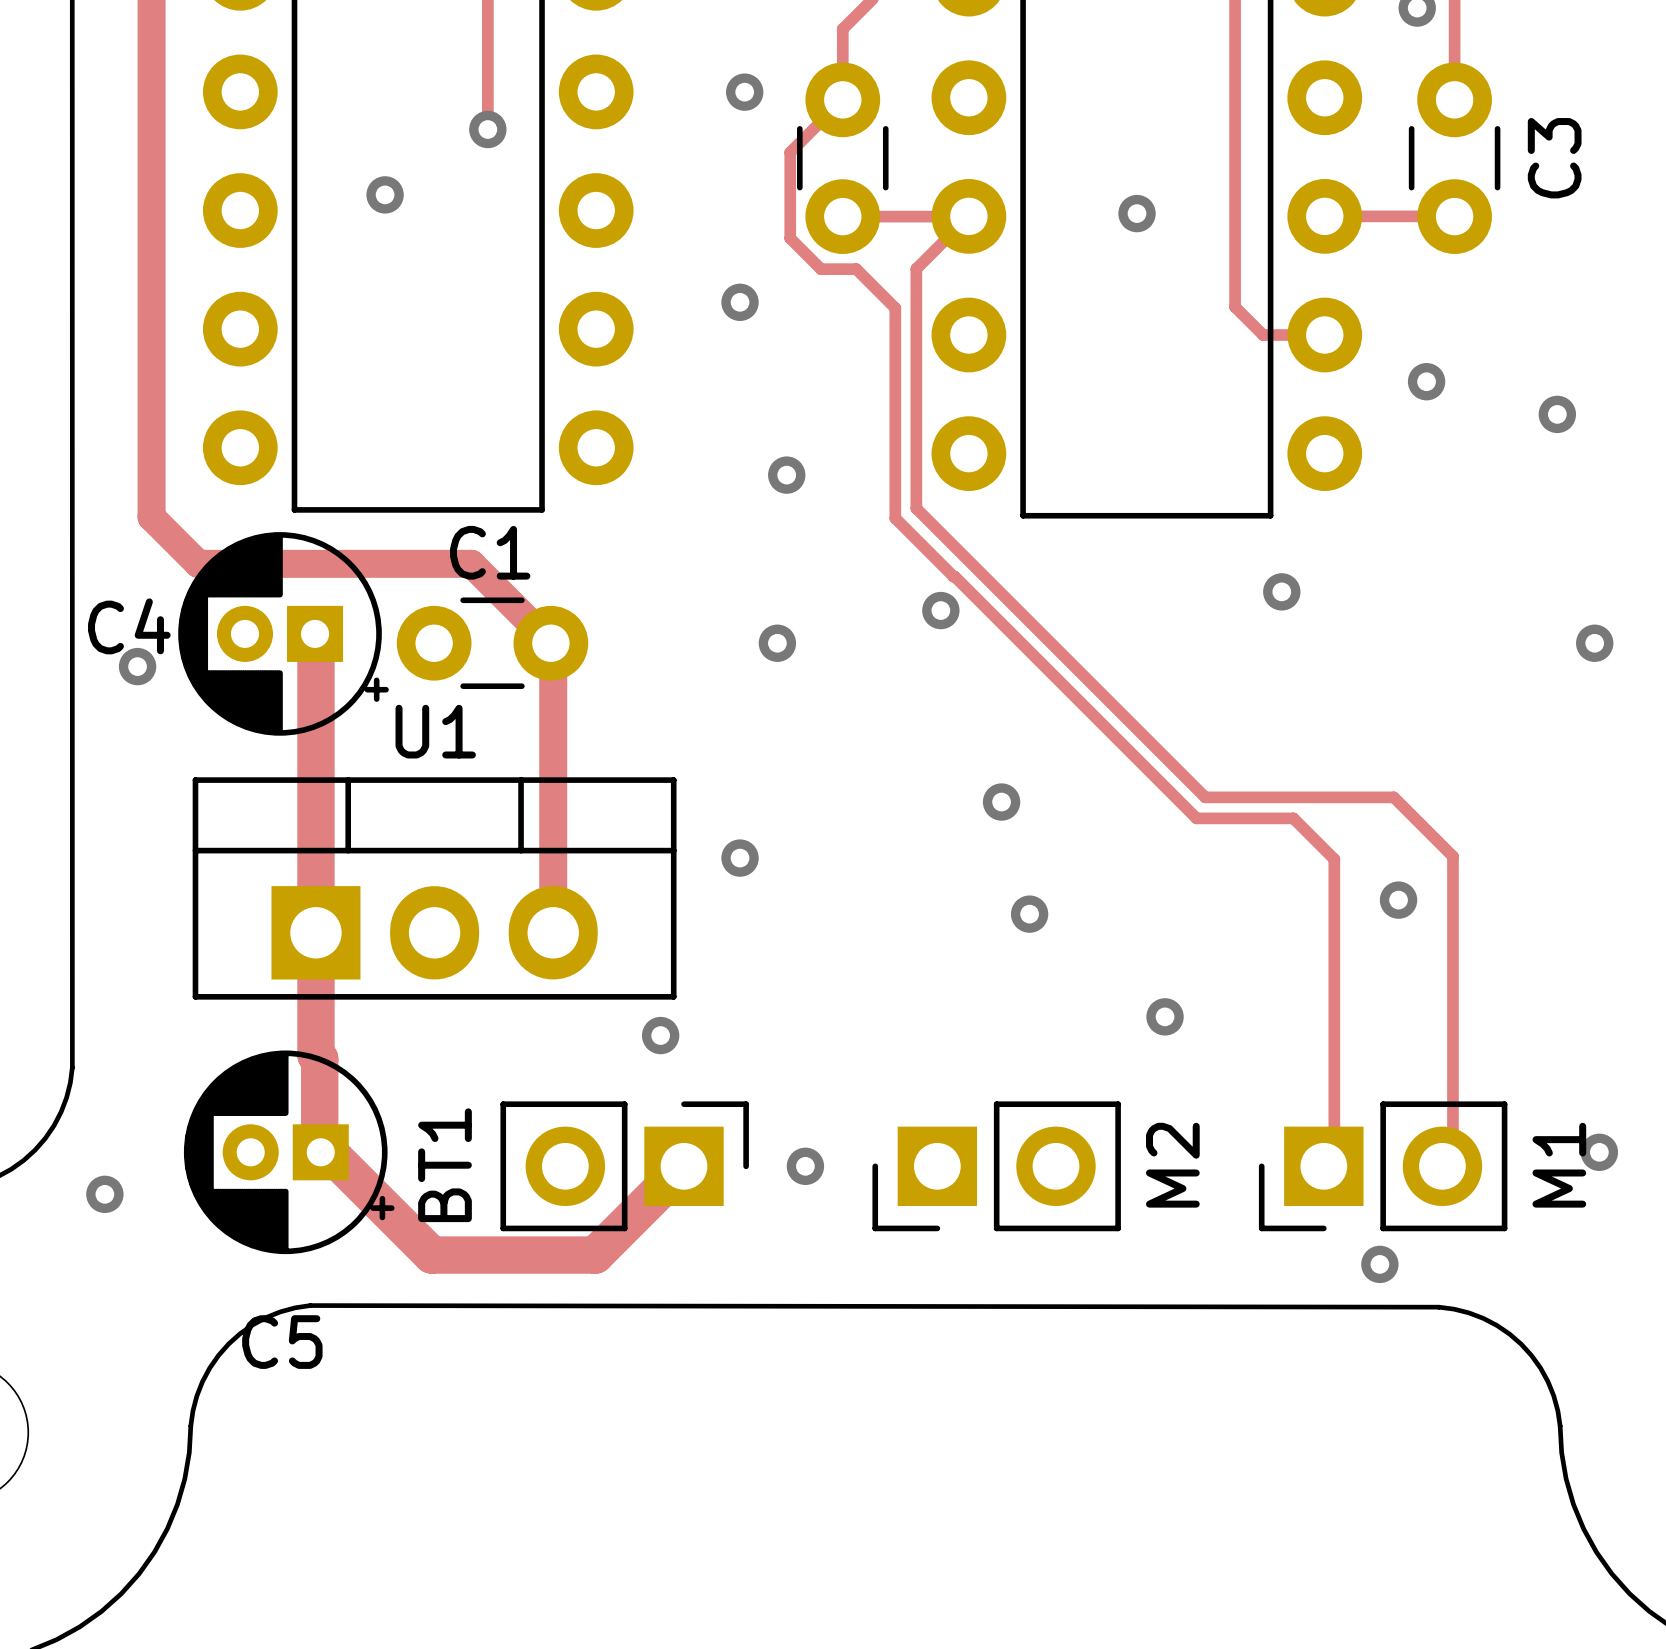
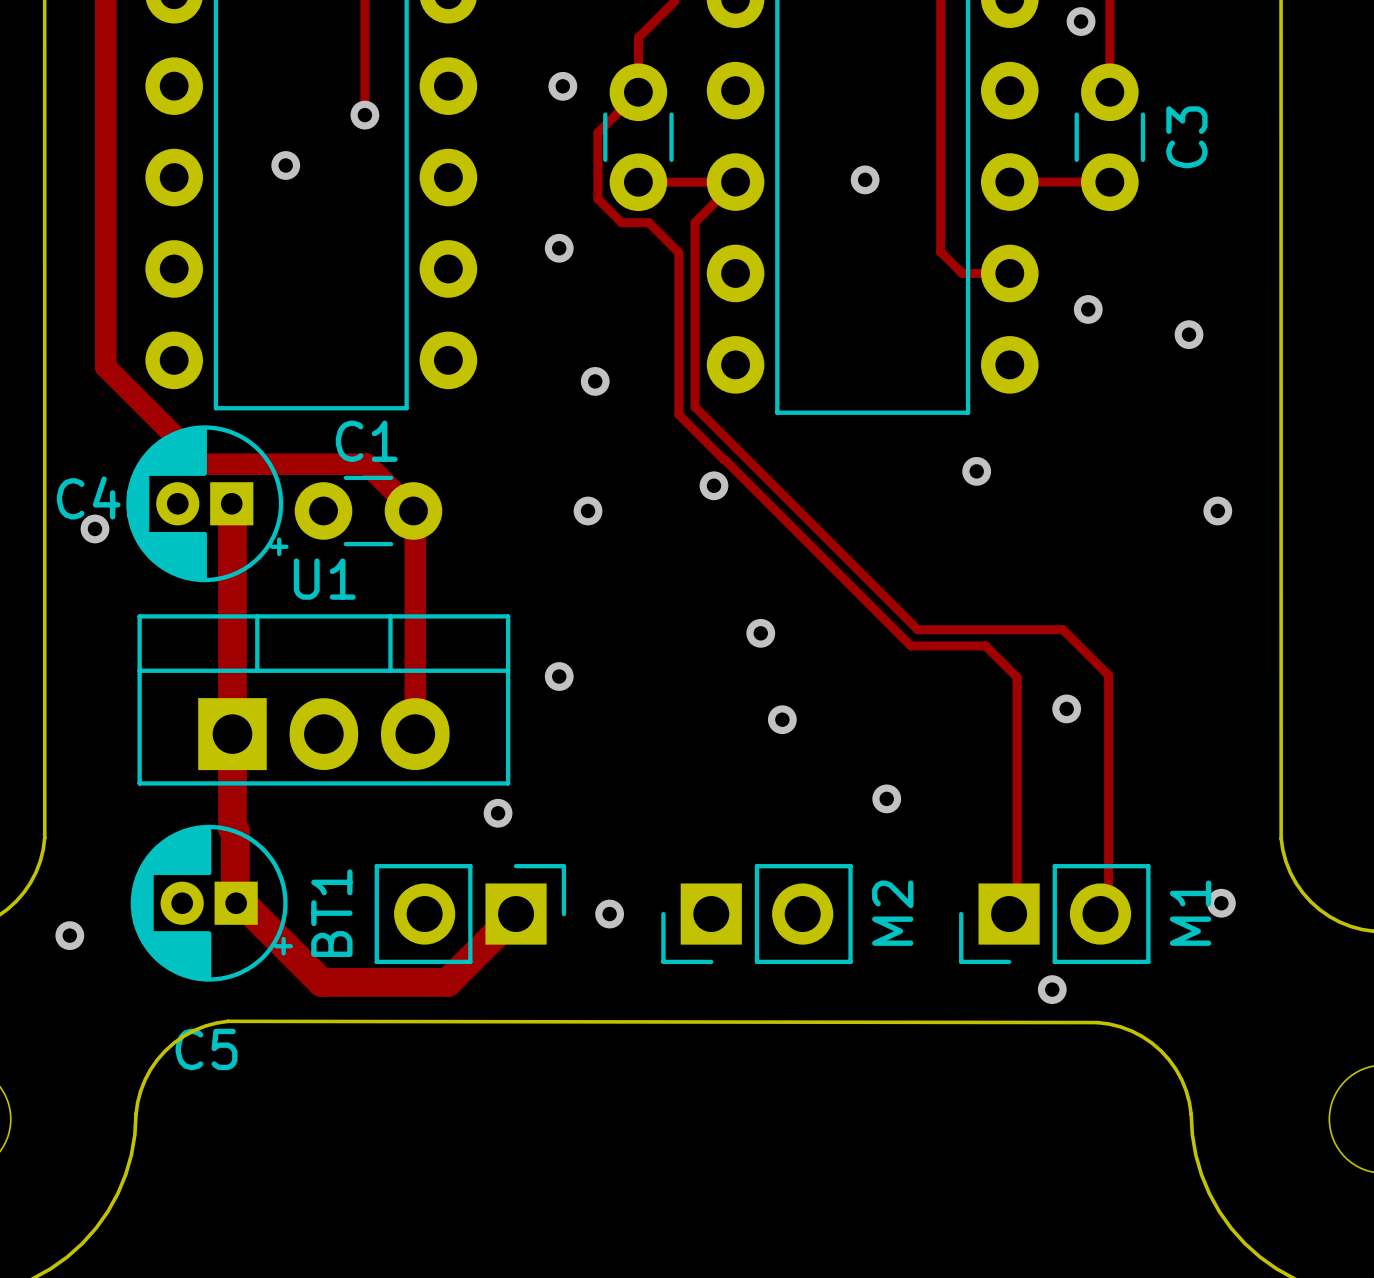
track: (151, 456) (151, 517) (198, 563) (471, 563) (490, 582) -> (105, 367) (202, 464) (366, 464)

